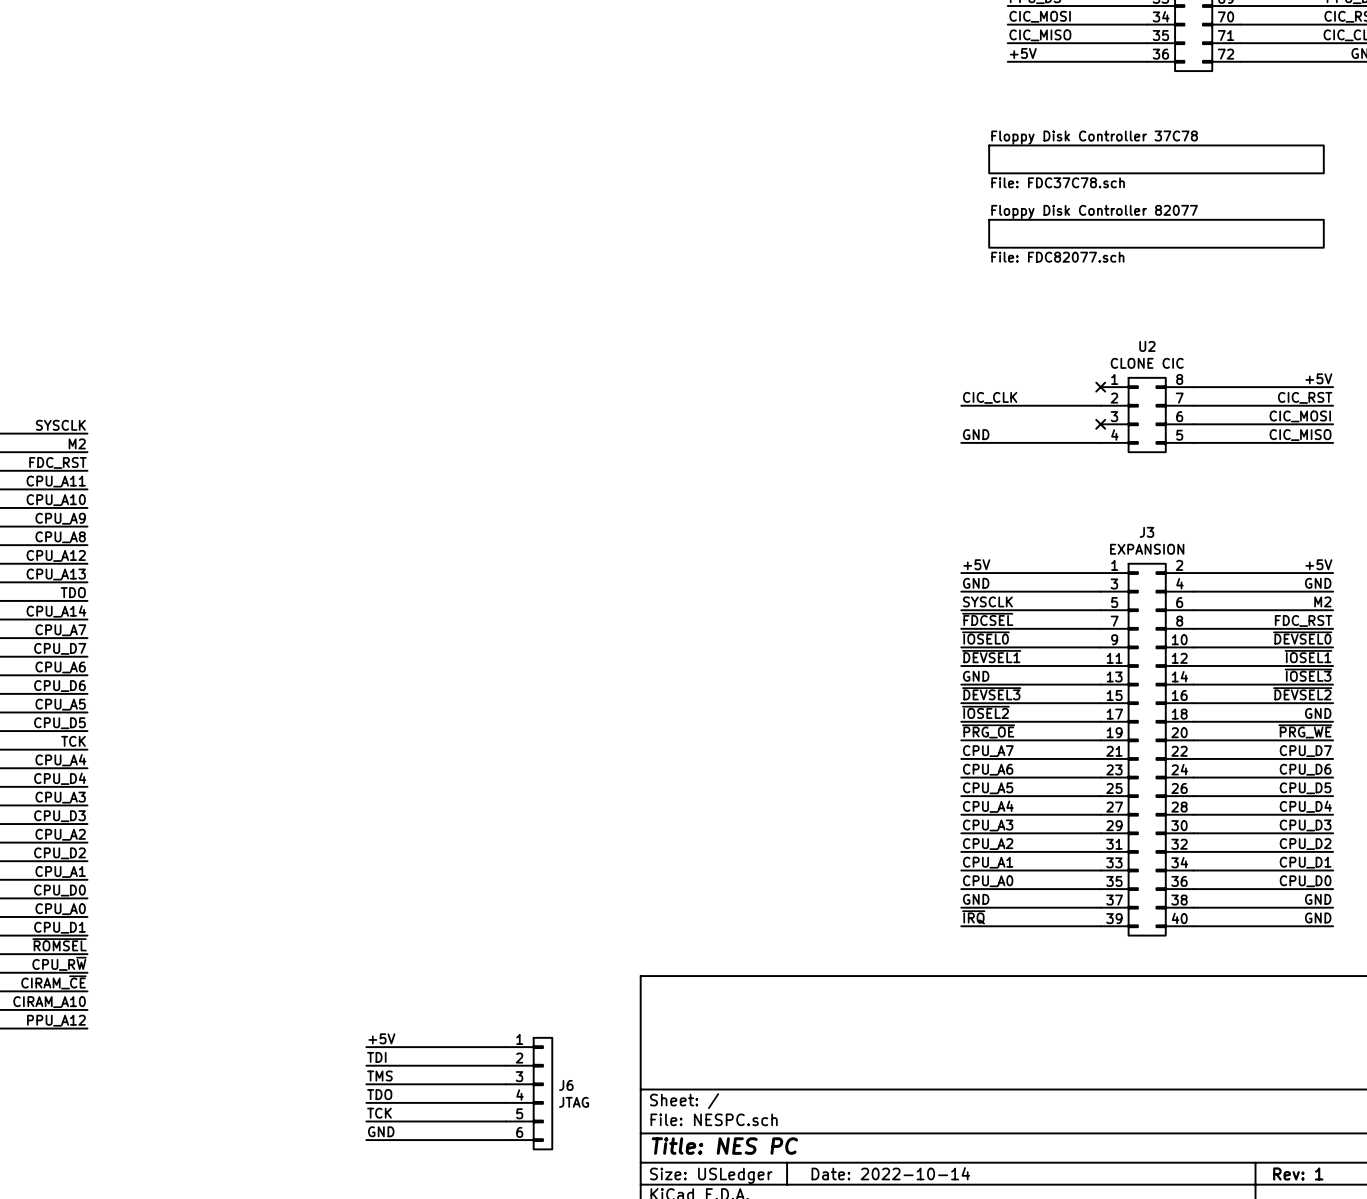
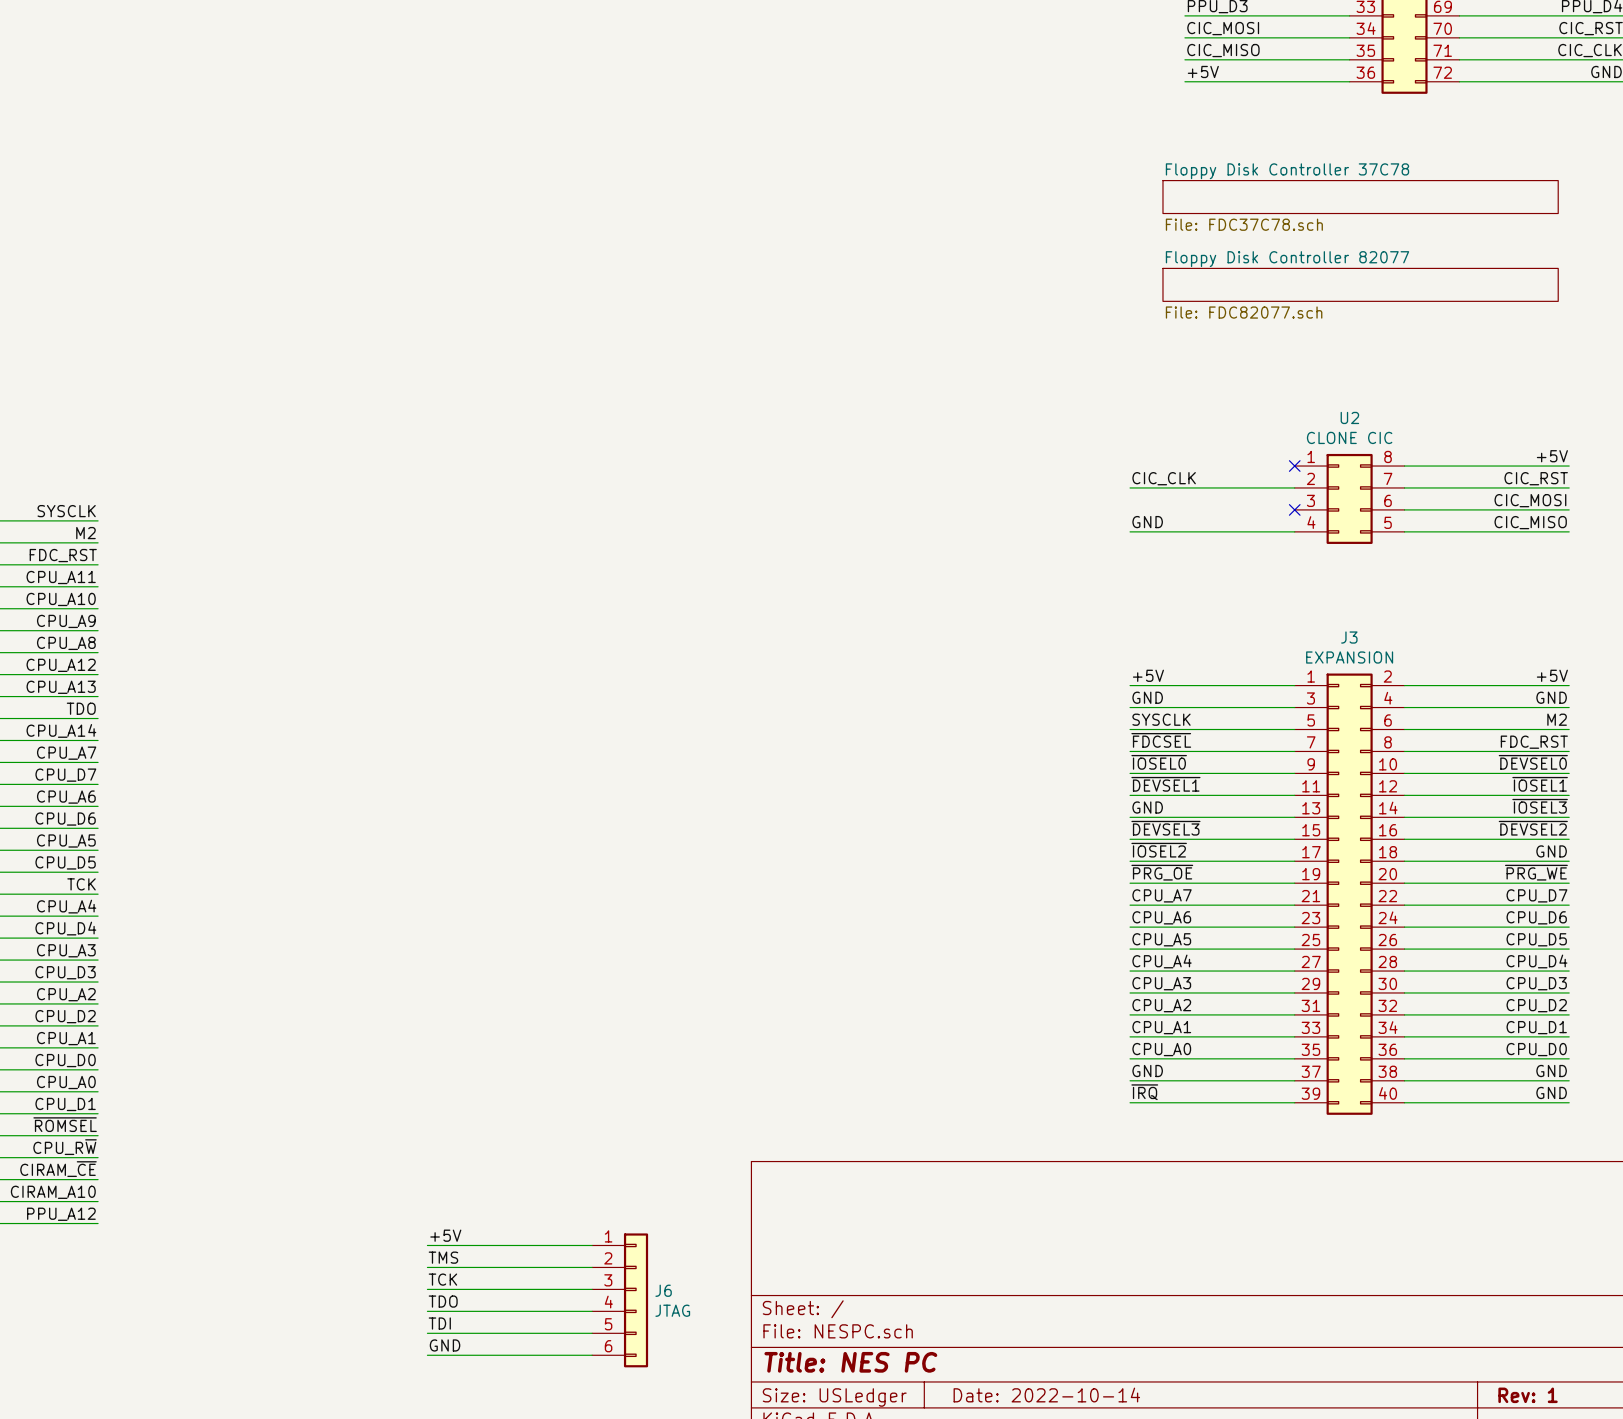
label: TDI (376, 1057) -> TMS (443, 1257)
label: TMS (379, 1076) -> TCK (442, 1279)
label: TCK (379, 1113) -> TDI (439, 1323)

